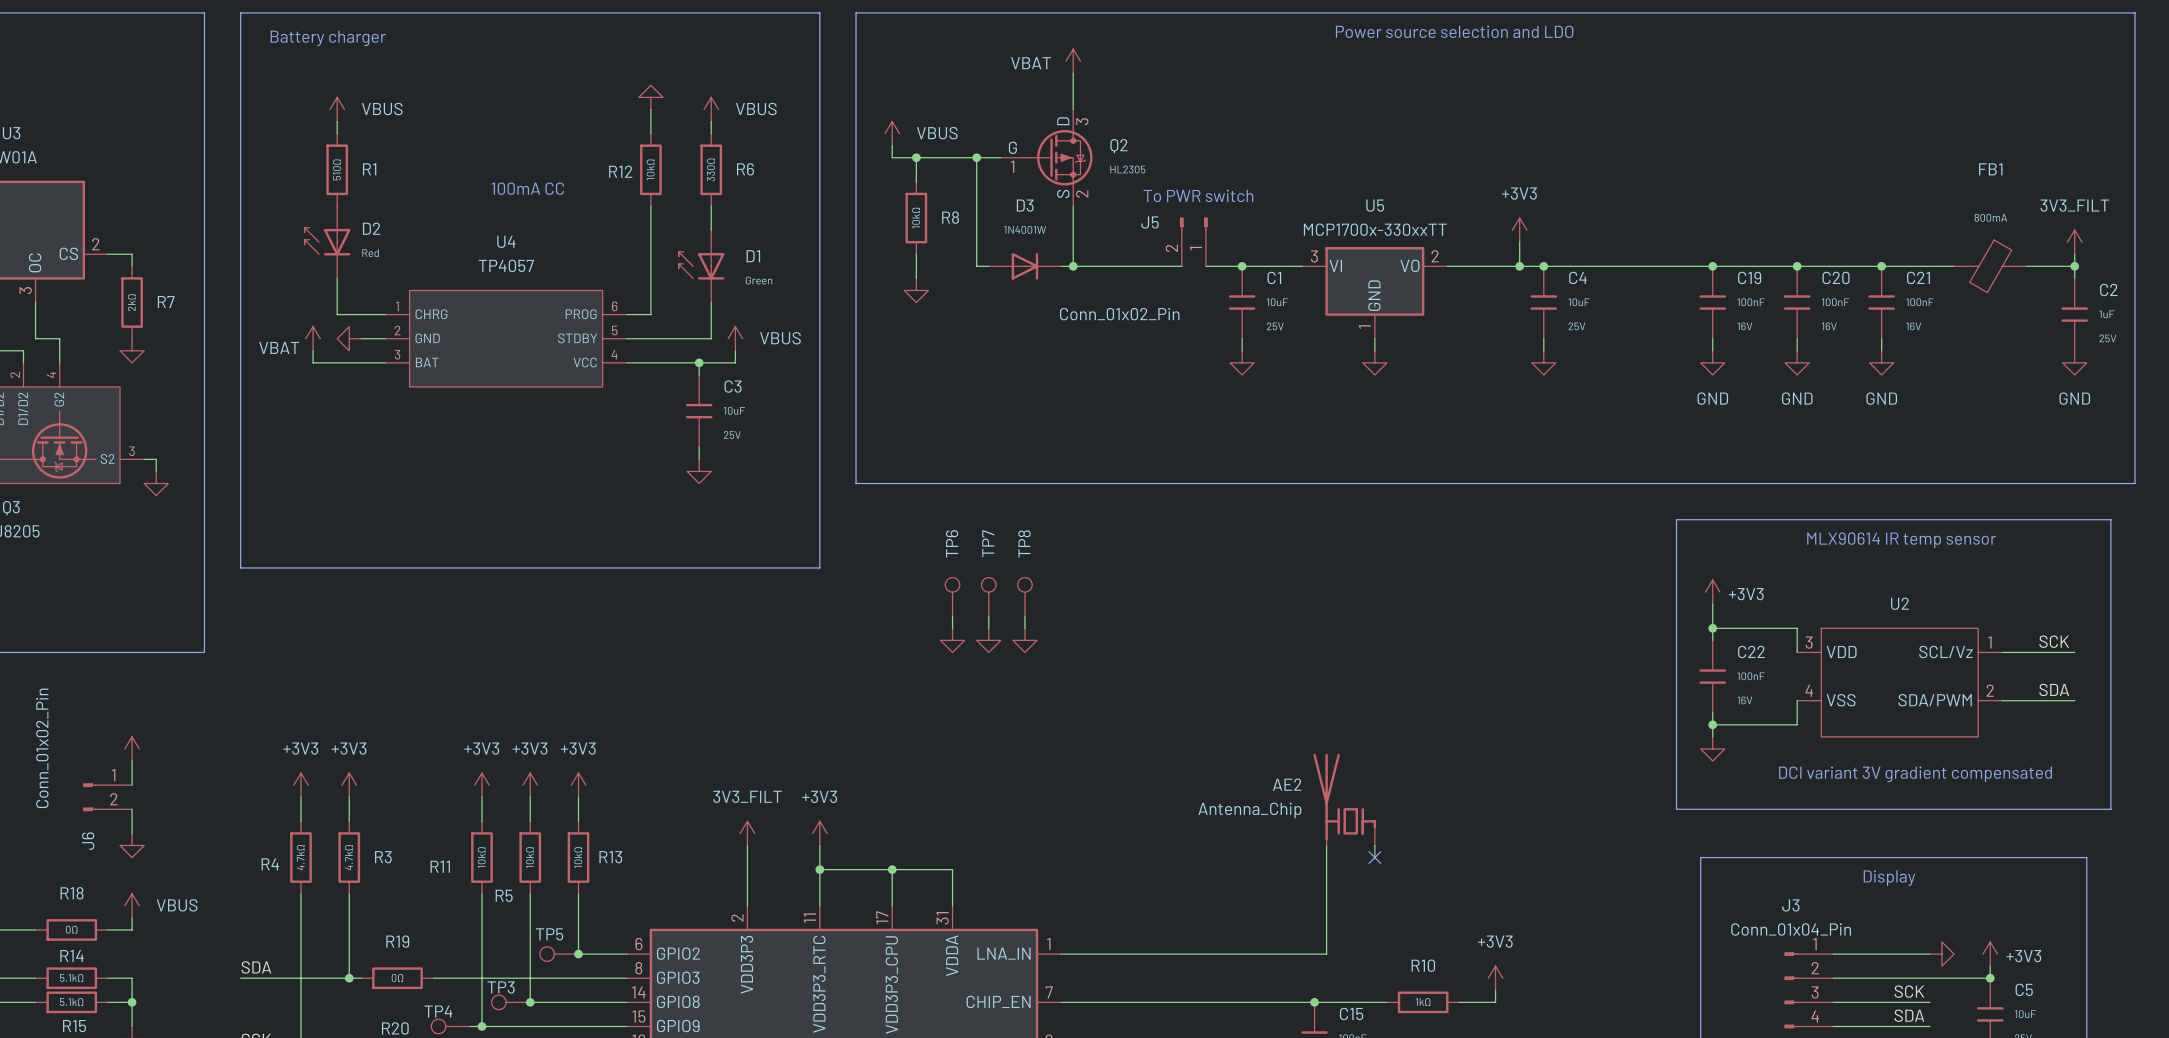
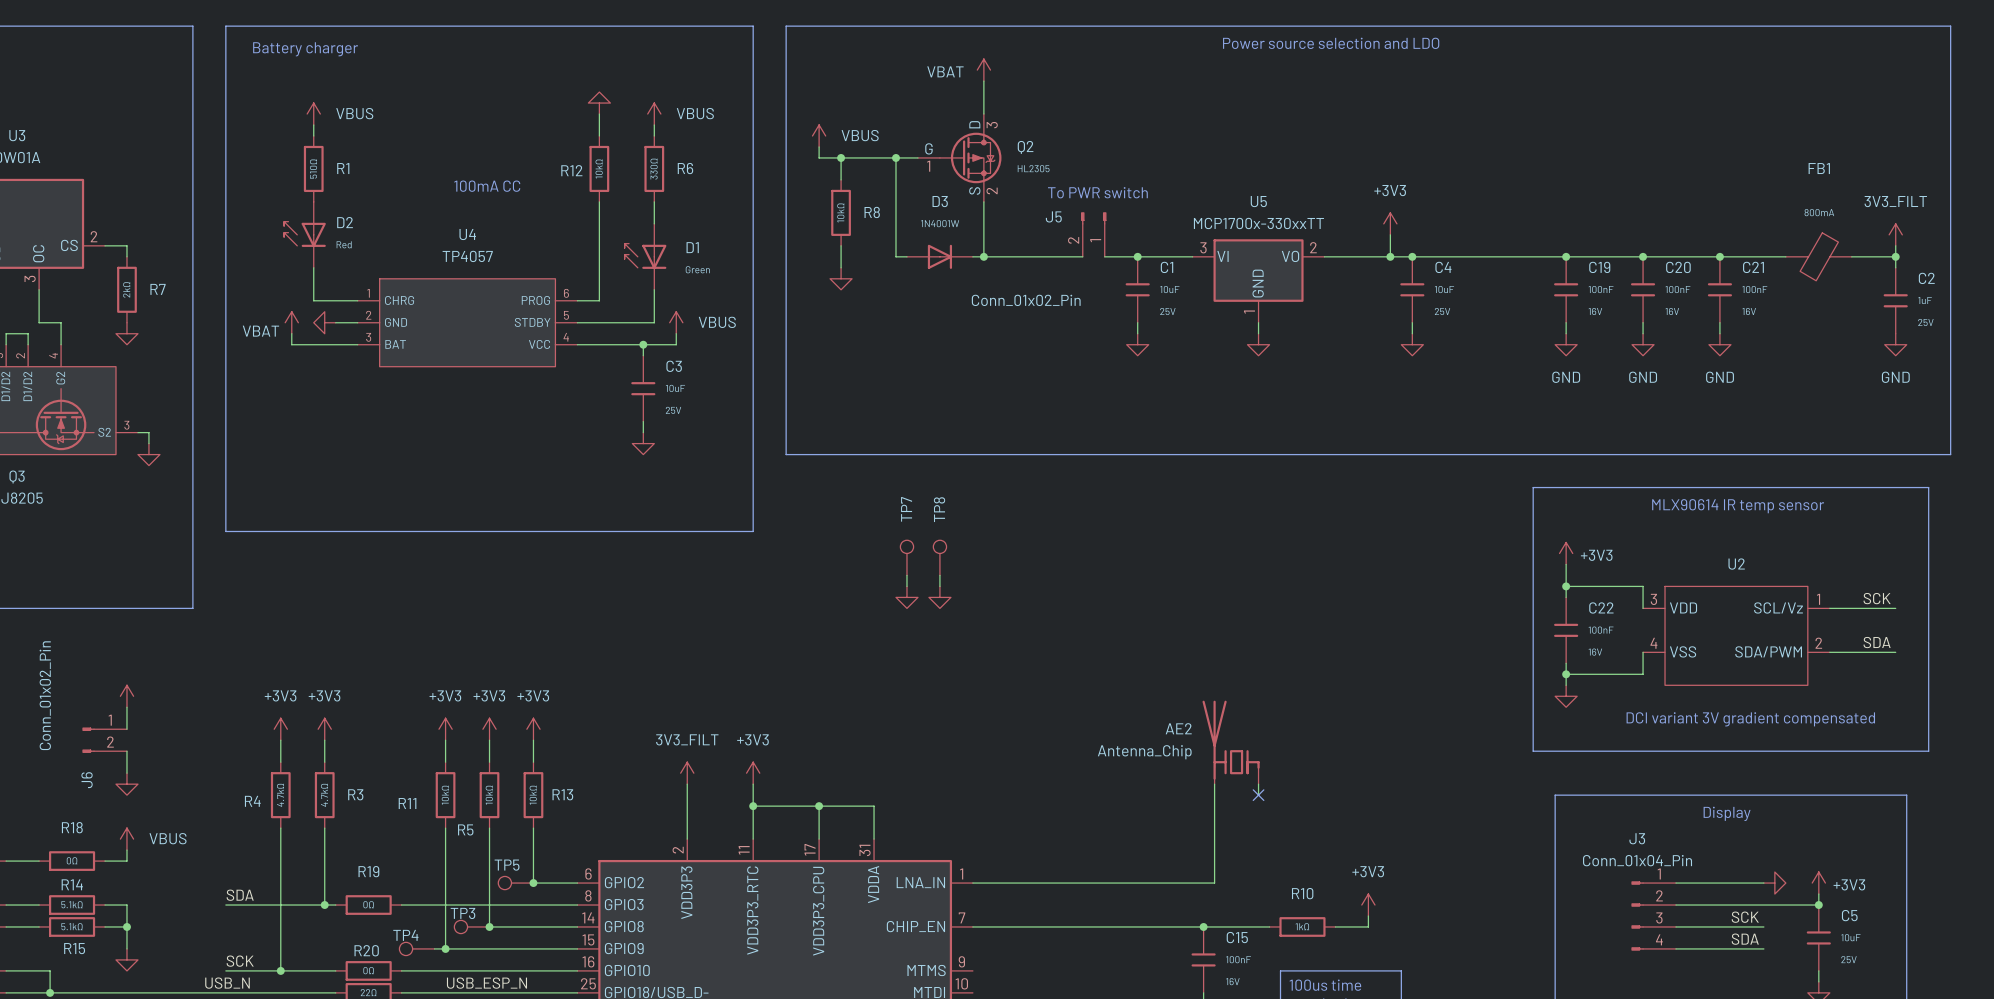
TP6: (952, 596) -> none
wire: (952, 616) (952, 628) -> none
power symbol: (952, 640) -> none

